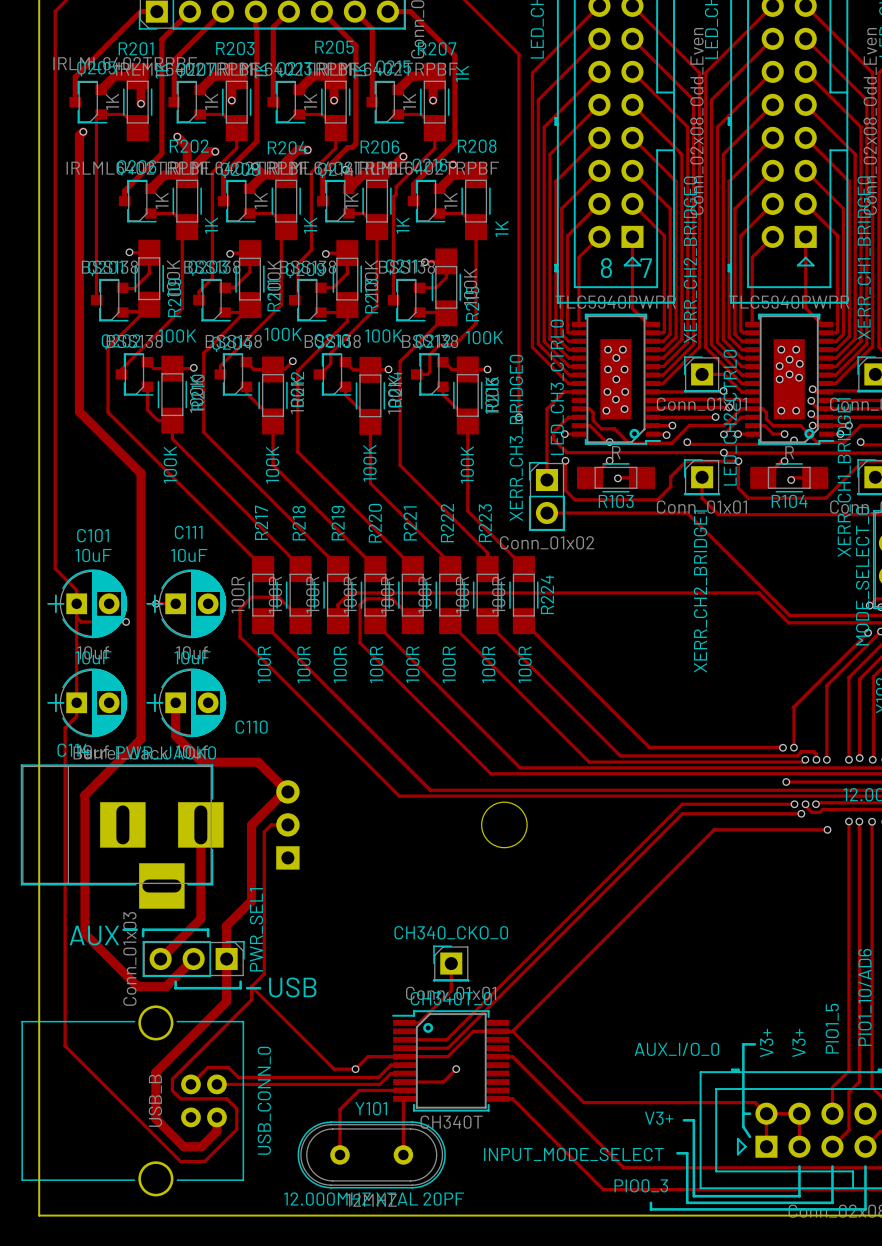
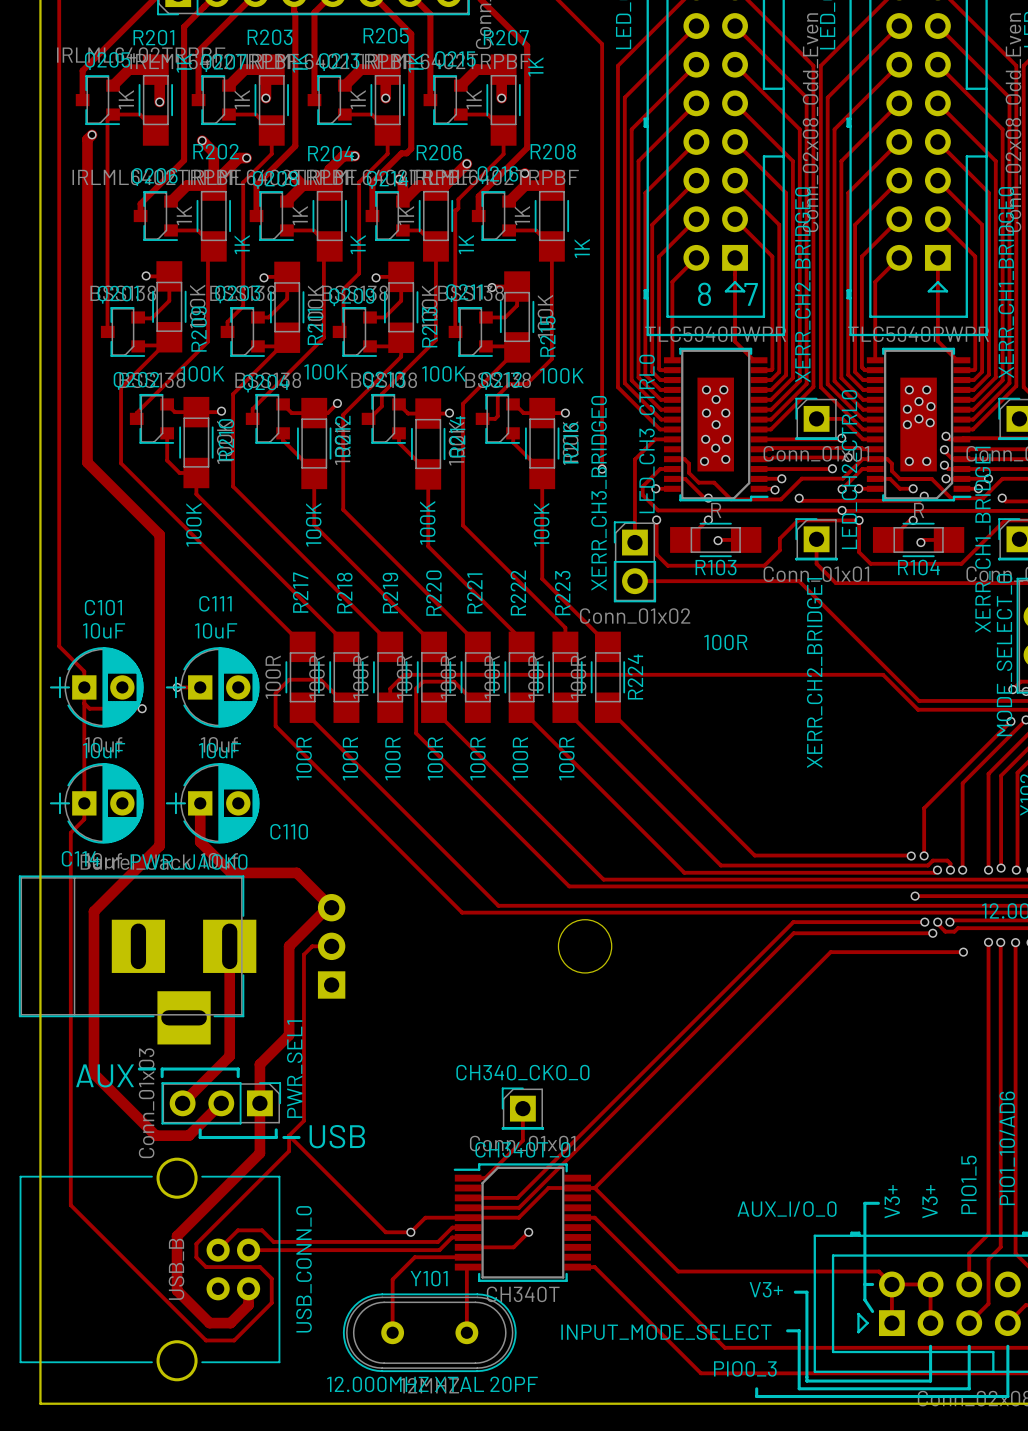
drawing: [629, 428, 640, 439] -> none
drawing: [804, 428, 815, 439] -> none
text rotation: 0° (525, 664) -> 90° clockwise (725, 642)
text position: 100R (525, 664) -> 100R (725, 642)
drawing: [423, 1022, 434, 1033] -> none

